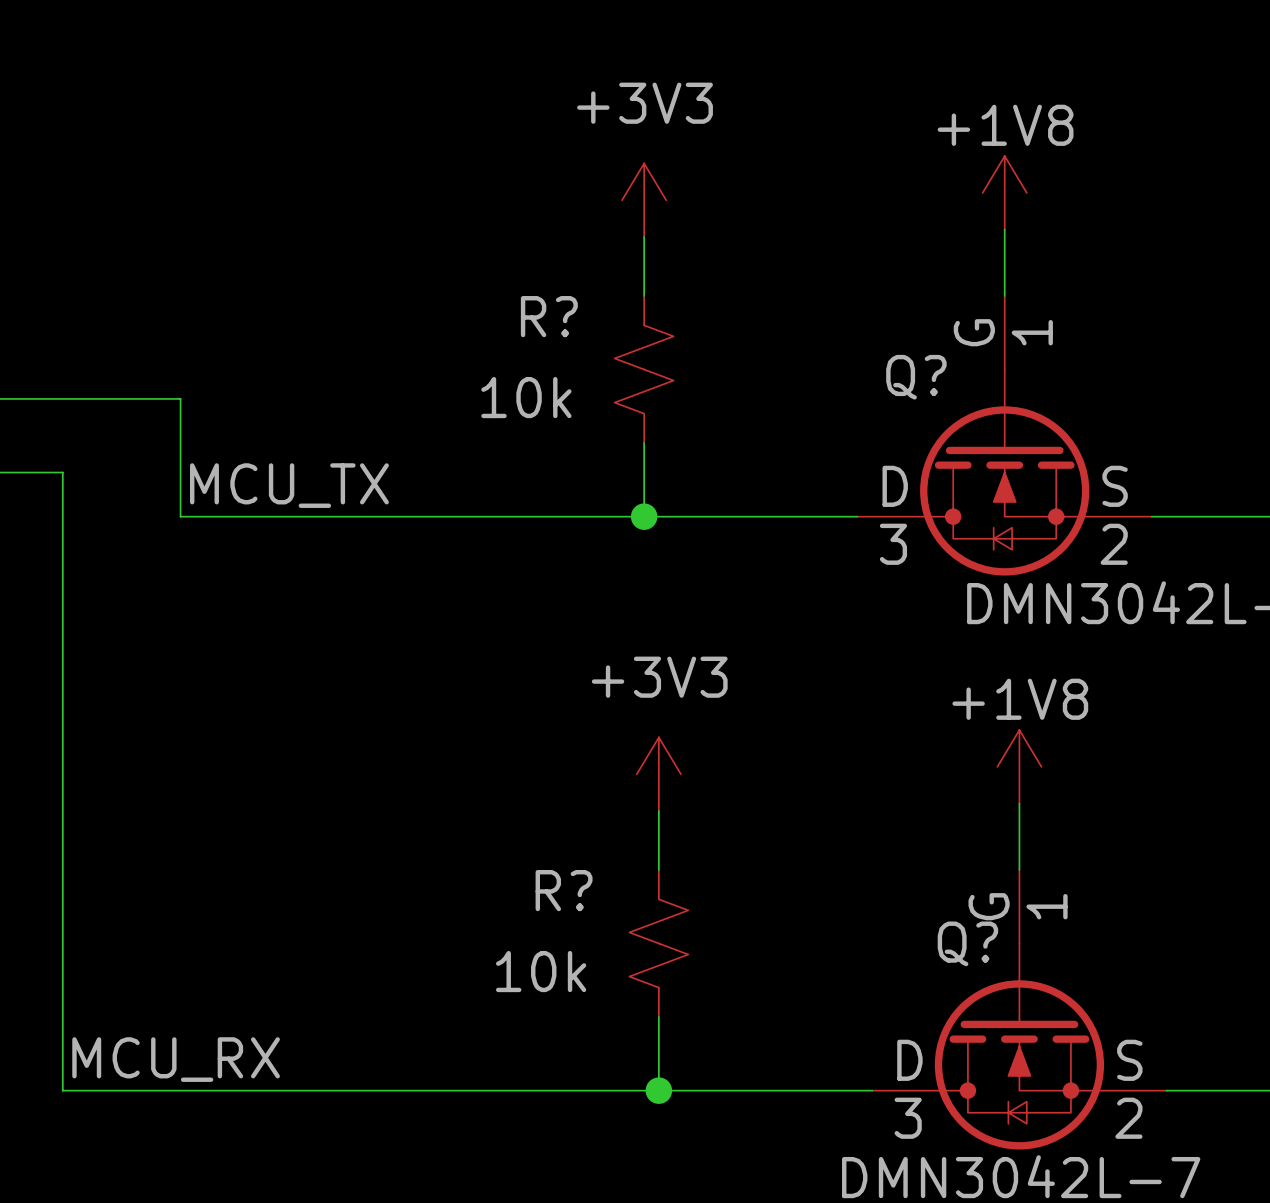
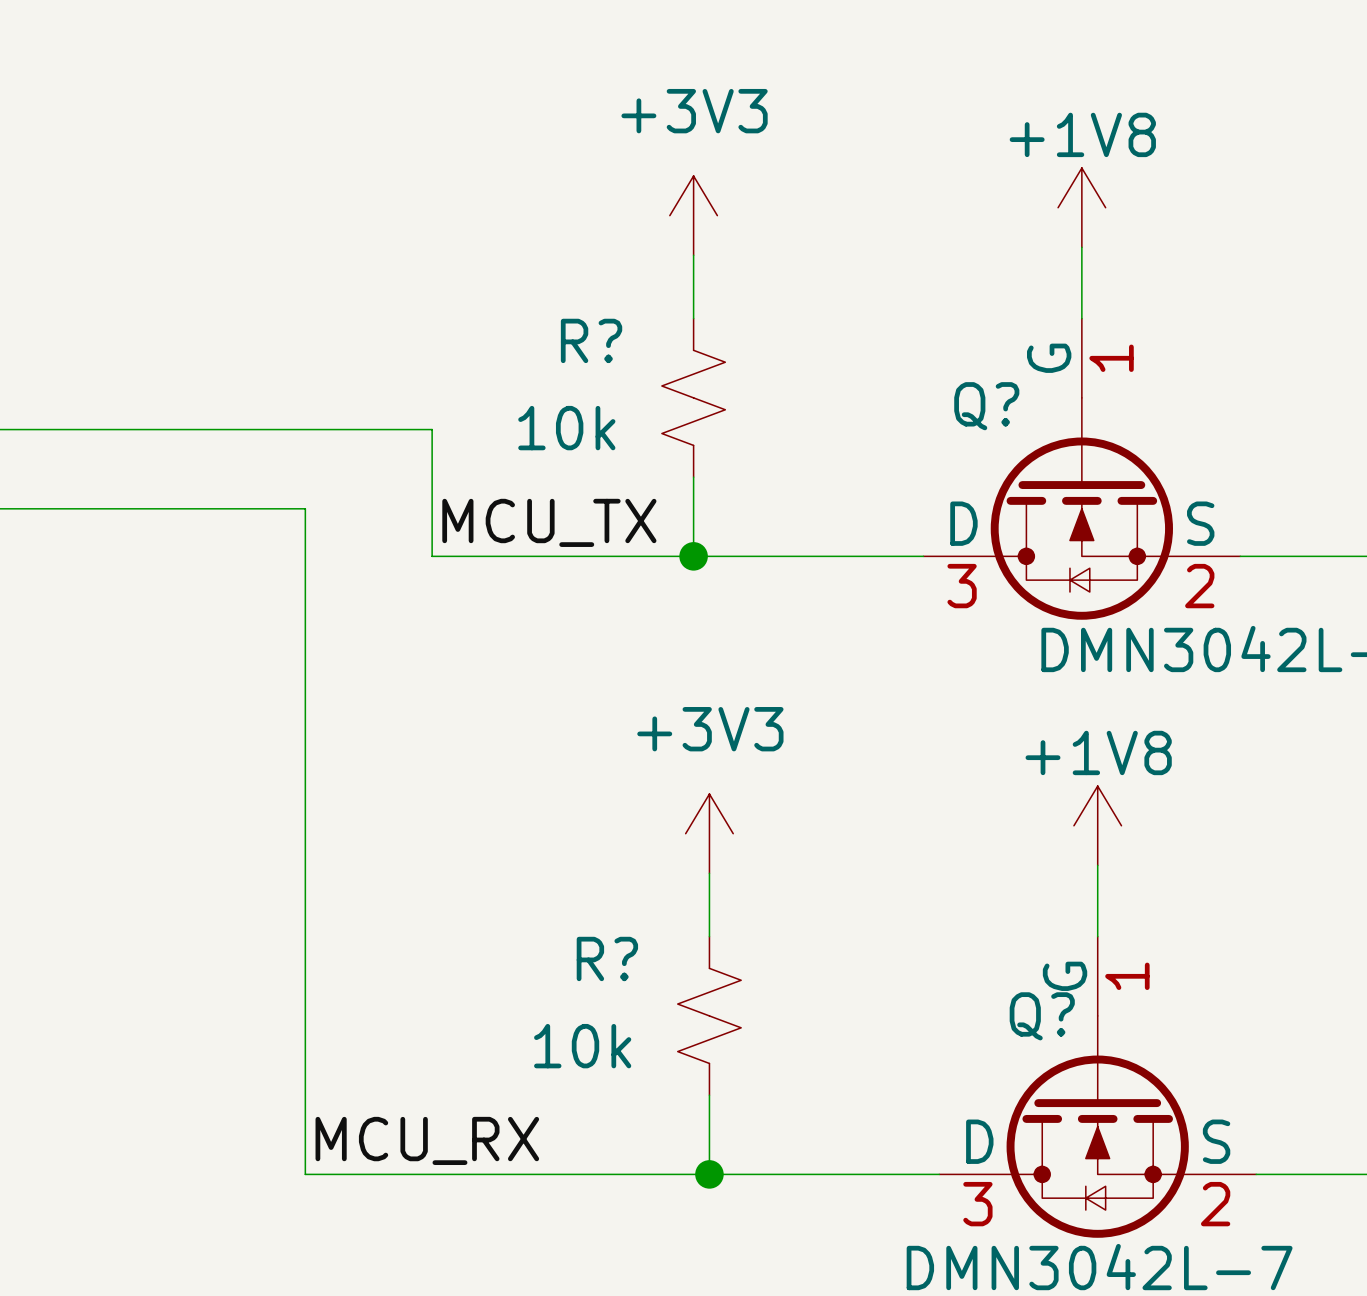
wire: (180, 398) (180, 516) (401, 516) -> (194, 429) (432, 429) (432, 556)
wire: (62, 472) (62, 1090) (283, 1090) -> (67, 508) (305, 508) (305, 1174)
label position: MCU_TX (289, 485) -> MCU_TX (549, 522)
label position: MCU_RX (176, 1059) -> MCU_RX (427, 1140)

